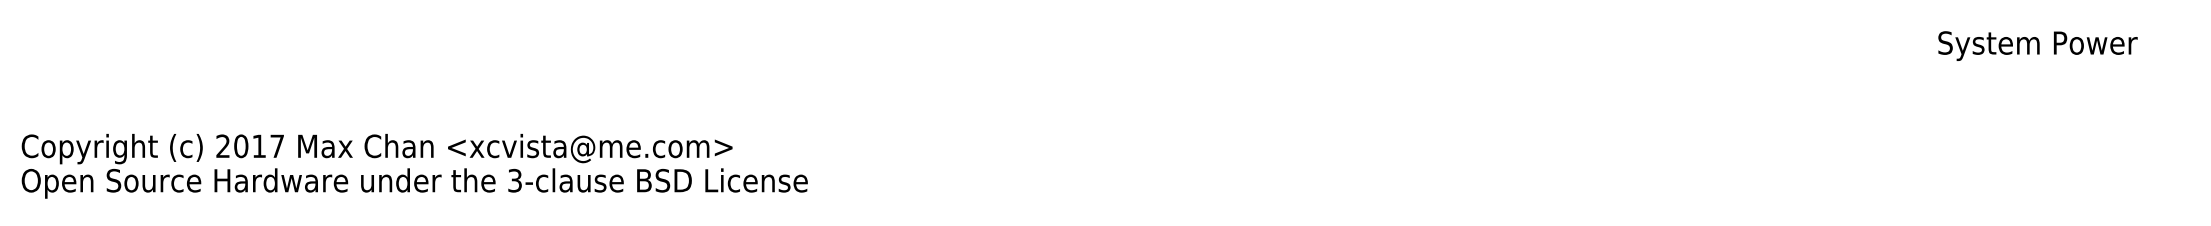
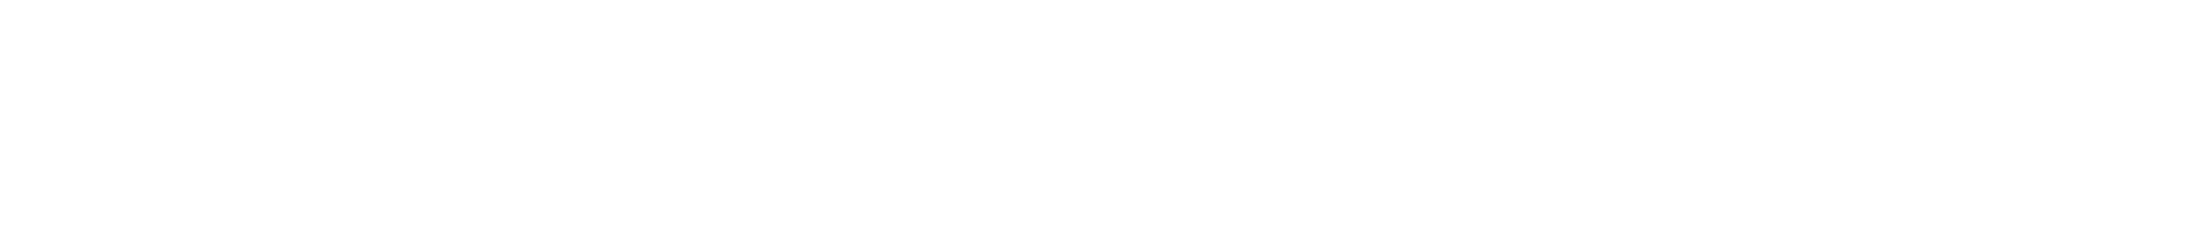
text: System Power (2038, 46) -> none
text: Copyright (c) 2017 Max Chan <xcvista@me.com> (377, 149) -> none
text: Open Source Hardware under the 3-clause BSD License (414, 183) -> none

